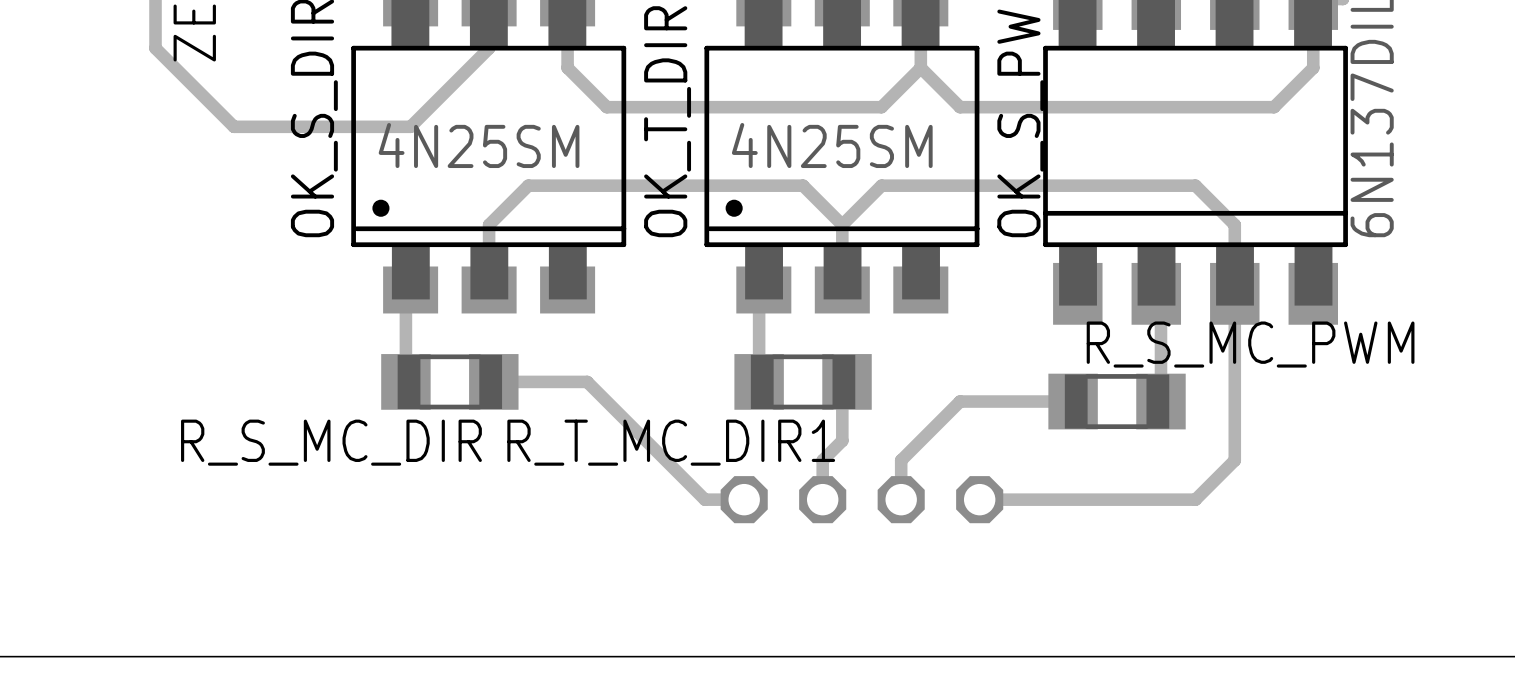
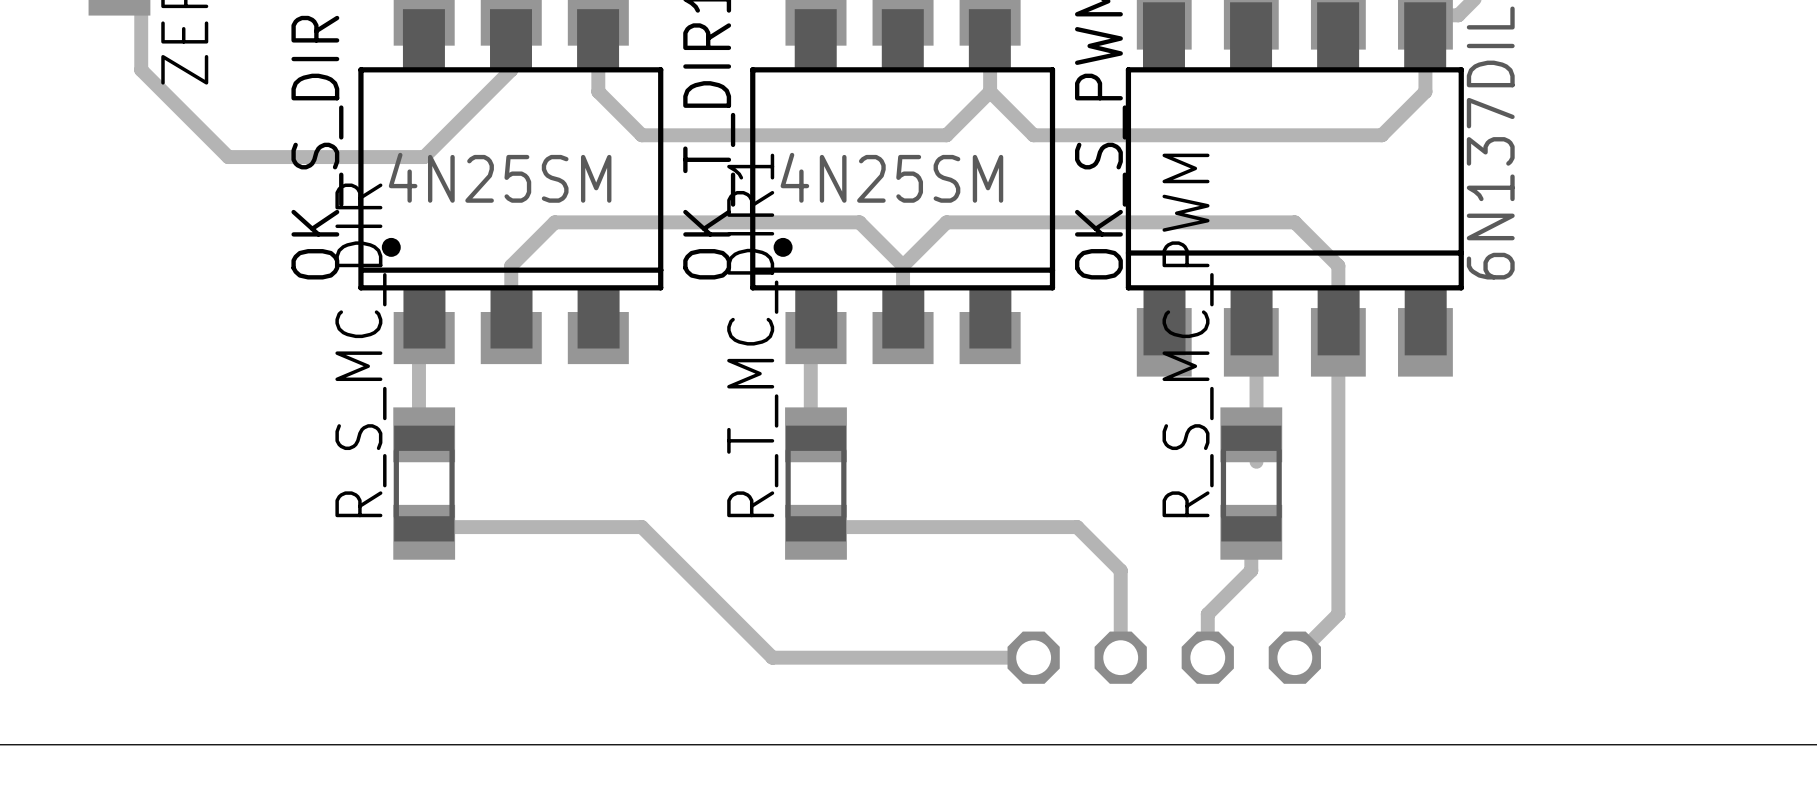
R_S_MC_PWM name position: R_S_MC_PWM (1250, 344) -> R_S_MC_PWM (1188, 335)
R_S_MC_DIR rotation: 0° (449, 381) -> 90° clockwise (424, 483)
track: (493, 381) (587, 381) (704, 499) (744, 499) -> none
R_T_MC_DIR1 rotation: 0° (803, 381) -> 90° clockwise (815, 483)
track: (847, 381) (842, 386) (842, 440) (822, 460) (822, 499) -> none
track: (1073, 401) (960, 401) (901, 460) (901, 499) -> none
R_S_MC_PWM rotation: 0° (1117, 401) -> 90° clockwise (1251, 483)
track: (1234, 460) (1195, 499) (979, 499) -> (1338, 527) (1338, 614) (1294, 657)
track: none -> (424, 532) (429, 527) (641, 527) (772, 657) (1033, 657)
track: none -> (815, 532) (821, 527) (1077, 527) (1120, 570) (1120, 657)
track: none -> (1251, 532) (1251, 570) (1207, 614) (1207, 657)
part: (744, 499) -> none
part: (822, 499) -> none
part: (901, 499) -> none
part: (979, 499) -> none
part: none -> (1033, 657)
part: none -> (1120, 657)
part: none -> (1207, 657)
part: none -> (1294, 657)

